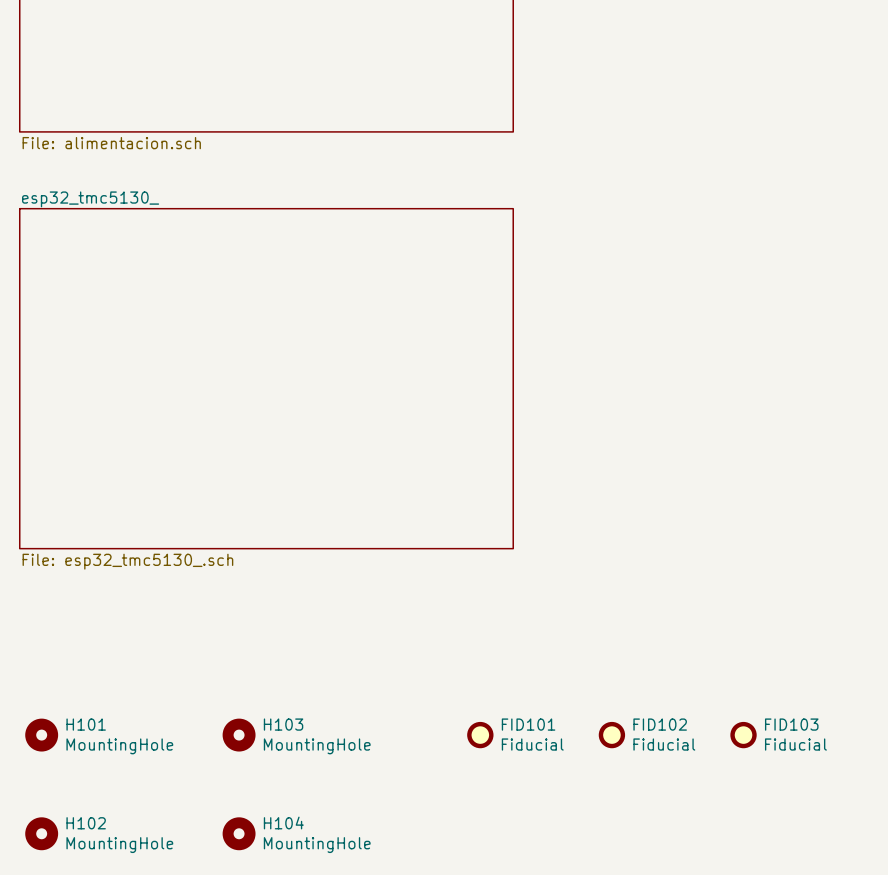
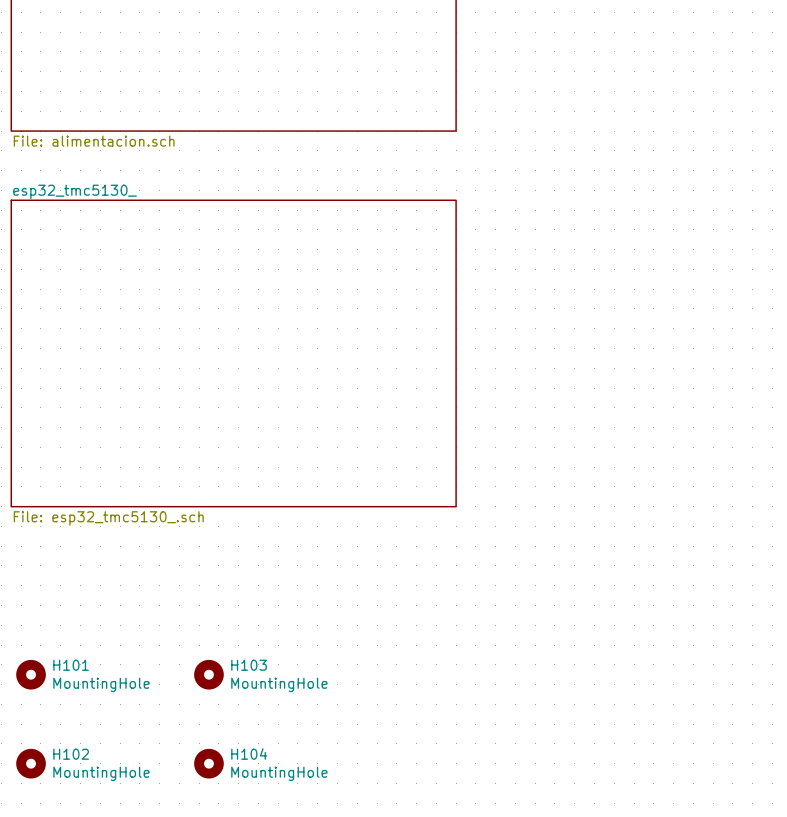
FID101: Fiducial (480, 735) -> none
FID102: Fiducial (611, 735) -> none
FID103: Fiducial (743, 735) -> none

